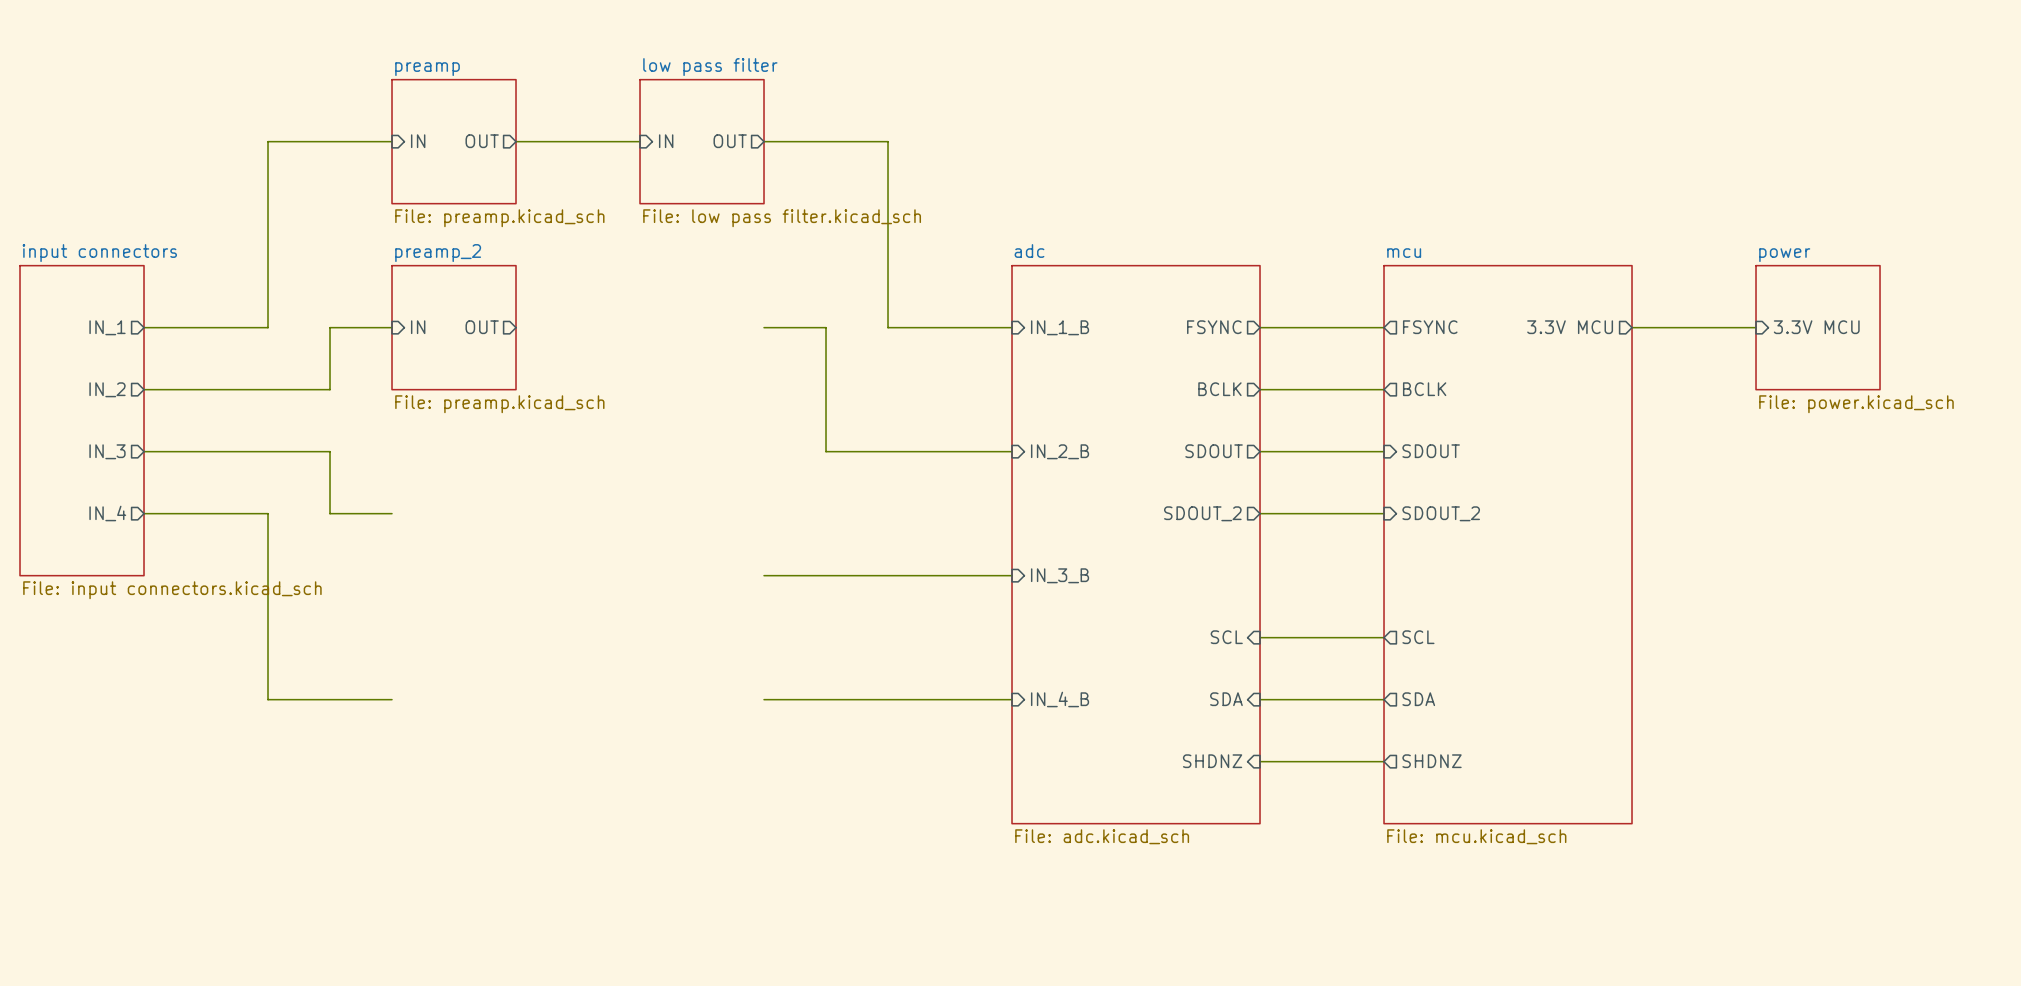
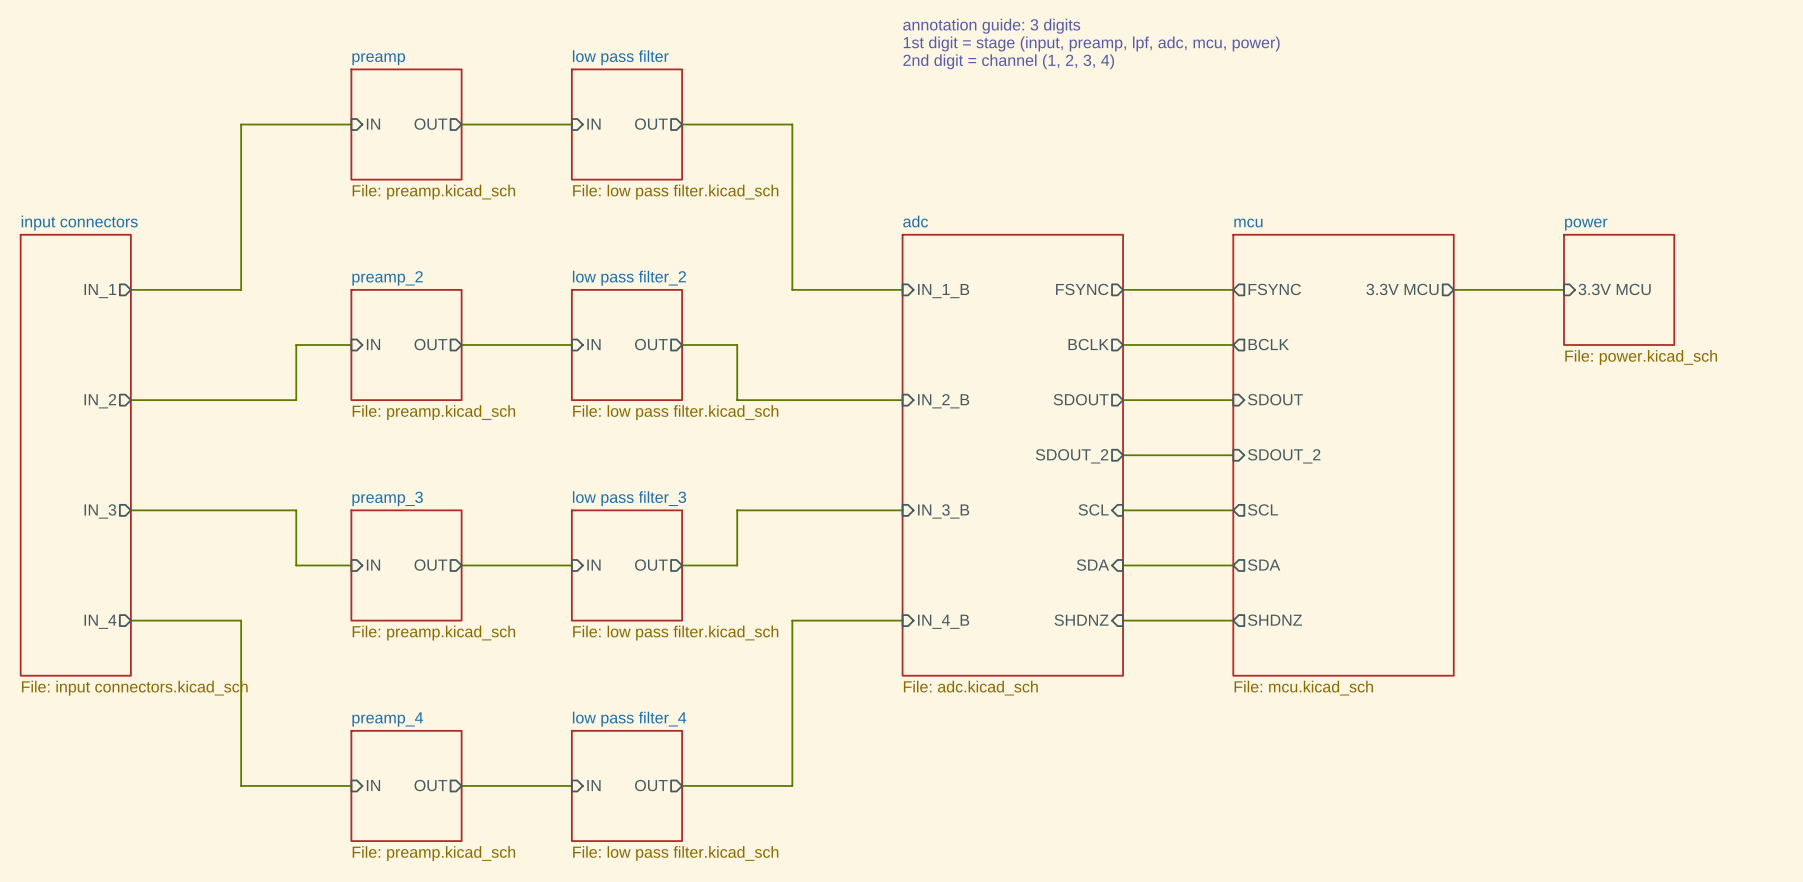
text: none -> annotation guide: 3 digits (991, 26)
text: none -> 1st digit = stage (input, preamp, lpf, adc, mcu, power) (1091, 43)
text: none -> 2nd digit = channel (1, 2, 3, 4) (1008, 61)
wire: (392, 327) (330, 327) (330, 389) (144, 389) -> none
sheet pin position: IN (418, 327) -> IN (373, 344)
sheet preamp_2 position: (454, 327) -> (406, 345)
sheet pin position: OUT (482, 327) -> OUT (430, 344)
wire: (764, 327) (826, 327) (826, 389) -> (682, 345) (737, 345)
sheet pin: IN_2 (107, 389) -> none
wire: none -> (461, 345) (571, 345)
sheet pin: none -> IN (593, 344)
sheet low pass filter_2: none -> File: low pass filter.kicad_sch (626, 345)
sheet pin: none -> OUT (651, 344)
sheet input connectors: File: input connectors.kicad_sch (82, 420) -> none
sheet pin: IN_3 (107, 451) -> IN_2 (100, 401)
wire: (330, 451) (330, 513) (392, 513) -> (296, 400) (296, 345) (351, 345)
sheet input connectors: none -> File: input connectors.kicad_sch (75, 455)
sheet pin position: IN_4 (107, 513) -> IN_4 (100, 621)
wire: (144, 513) (268, 513) (268, 699) (392, 699) -> (130, 620) (241, 620) (241, 785) (351, 785)
sheet adc: none -> File: adc.kicad_sch (1012, 455)
sheet mcu: none -> File: mcu.kicad_sch (1343, 455)
sheet adc: File: adc.kicad_sch (1136, 544) -> none
sheet mcu: File: mcu.kicad_sch (1508, 544) -> none
sheet pin: none -> IN_3 (100, 511)
wire: none -> (130, 510) (296, 510) (296, 565) (351, 565)
wire: (764, 575) (826, 575) -> (682, 565) (737, 565) (737, 510)
sheet pin: none -> SCL (1093, 509)
sheet pin: none -> SCL (1262, 509)
sheet pin: none -> IN (373, 565)
sheet preamp_3: none -> File: preamp.kicad_sch (406, 565)
sheet pin: none -> OUT (430, 565)
wire: none -> (461, 565) (571, 565)
sheet pin: none -> IN (593, 565)
sheet low pass filter_3: none -> File: low pass filter.kicad_sch (626, 565)
sheet pin: none -> OUT (651, 565)
sheet pin: SCL (1226, 637) -> SDA (1092, 565)
sheet pin: SCL (1418, 637) -> SDA (1264, 565)
wire: (764, 699) (888, 699) -> (682, 785) (792, 785) (792, 620)
sheet pin: SDA (1226, 699) -> SHDNZ (1081, 620)
sheet pin: SDA (1418, 699) -> SHDNZ (1275, 620)
sheet pin: SHDNZ (1212, 761) -> none
wire: (1260, 761) (1384, 761) -> (1123, 510) (1233, 510)
sheet pin: SHDNZ (1432, 761) -> none
sheet pin: none -> IN (373, 785)
sheet preamp_4: none -> File: preamp.kicad_sch (406, 785)
sheet pin: none -> OUT (430, 785)
wire: none -> (461, 785) (571, 785)
sheet pin: none -> IN (593, 785)
sheet low pass filter_4: none -> File: low pass filter.kicad_sch (626, 785)
sheet pin: none -> OUT (651, 785)

